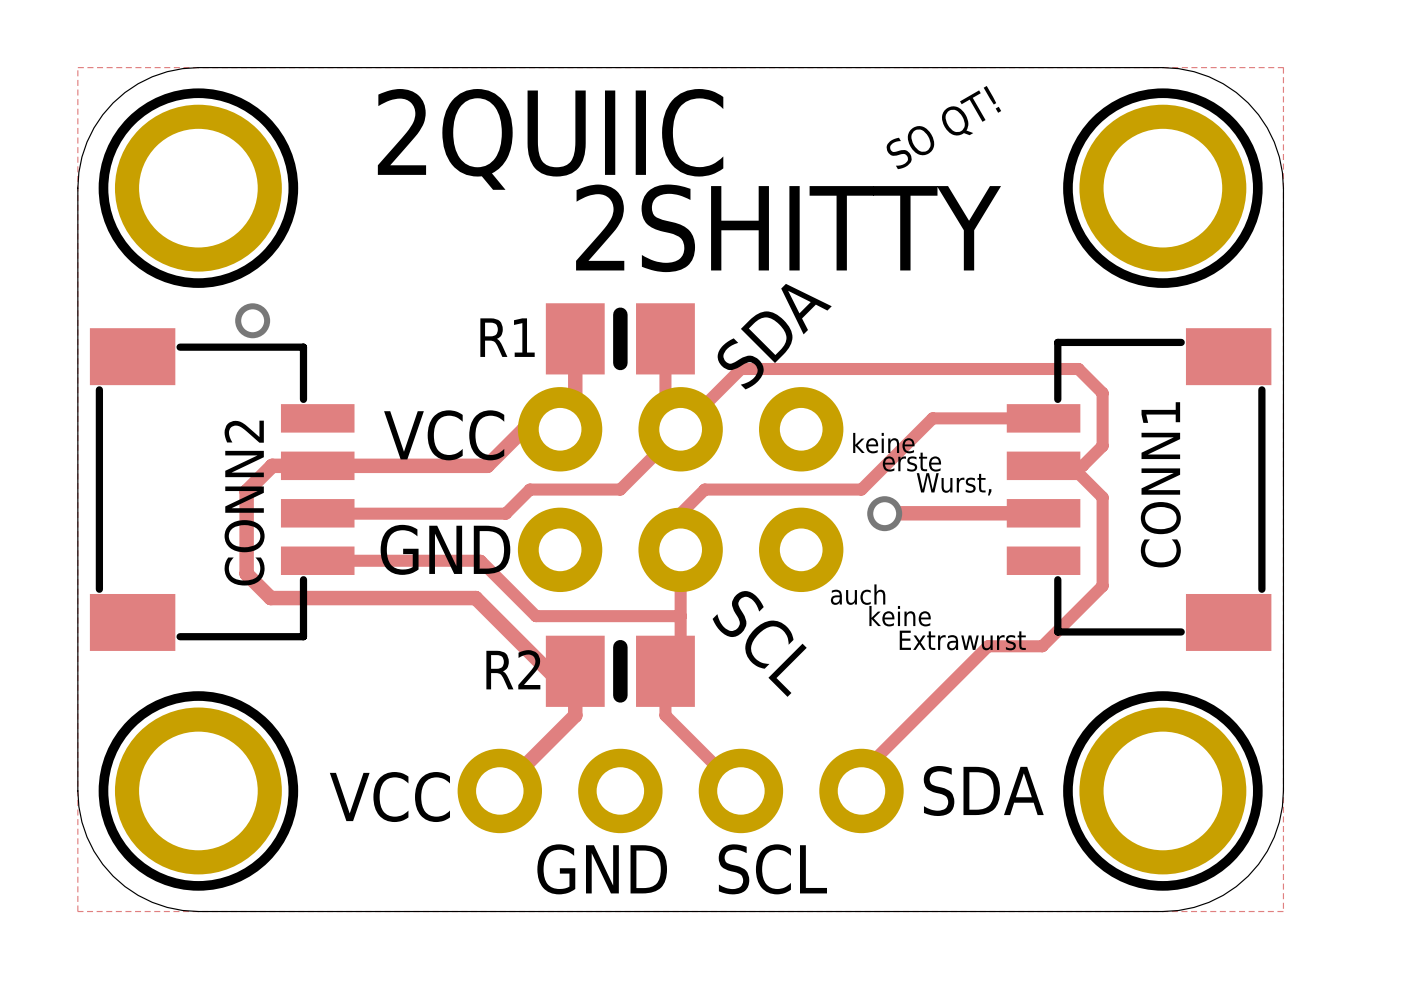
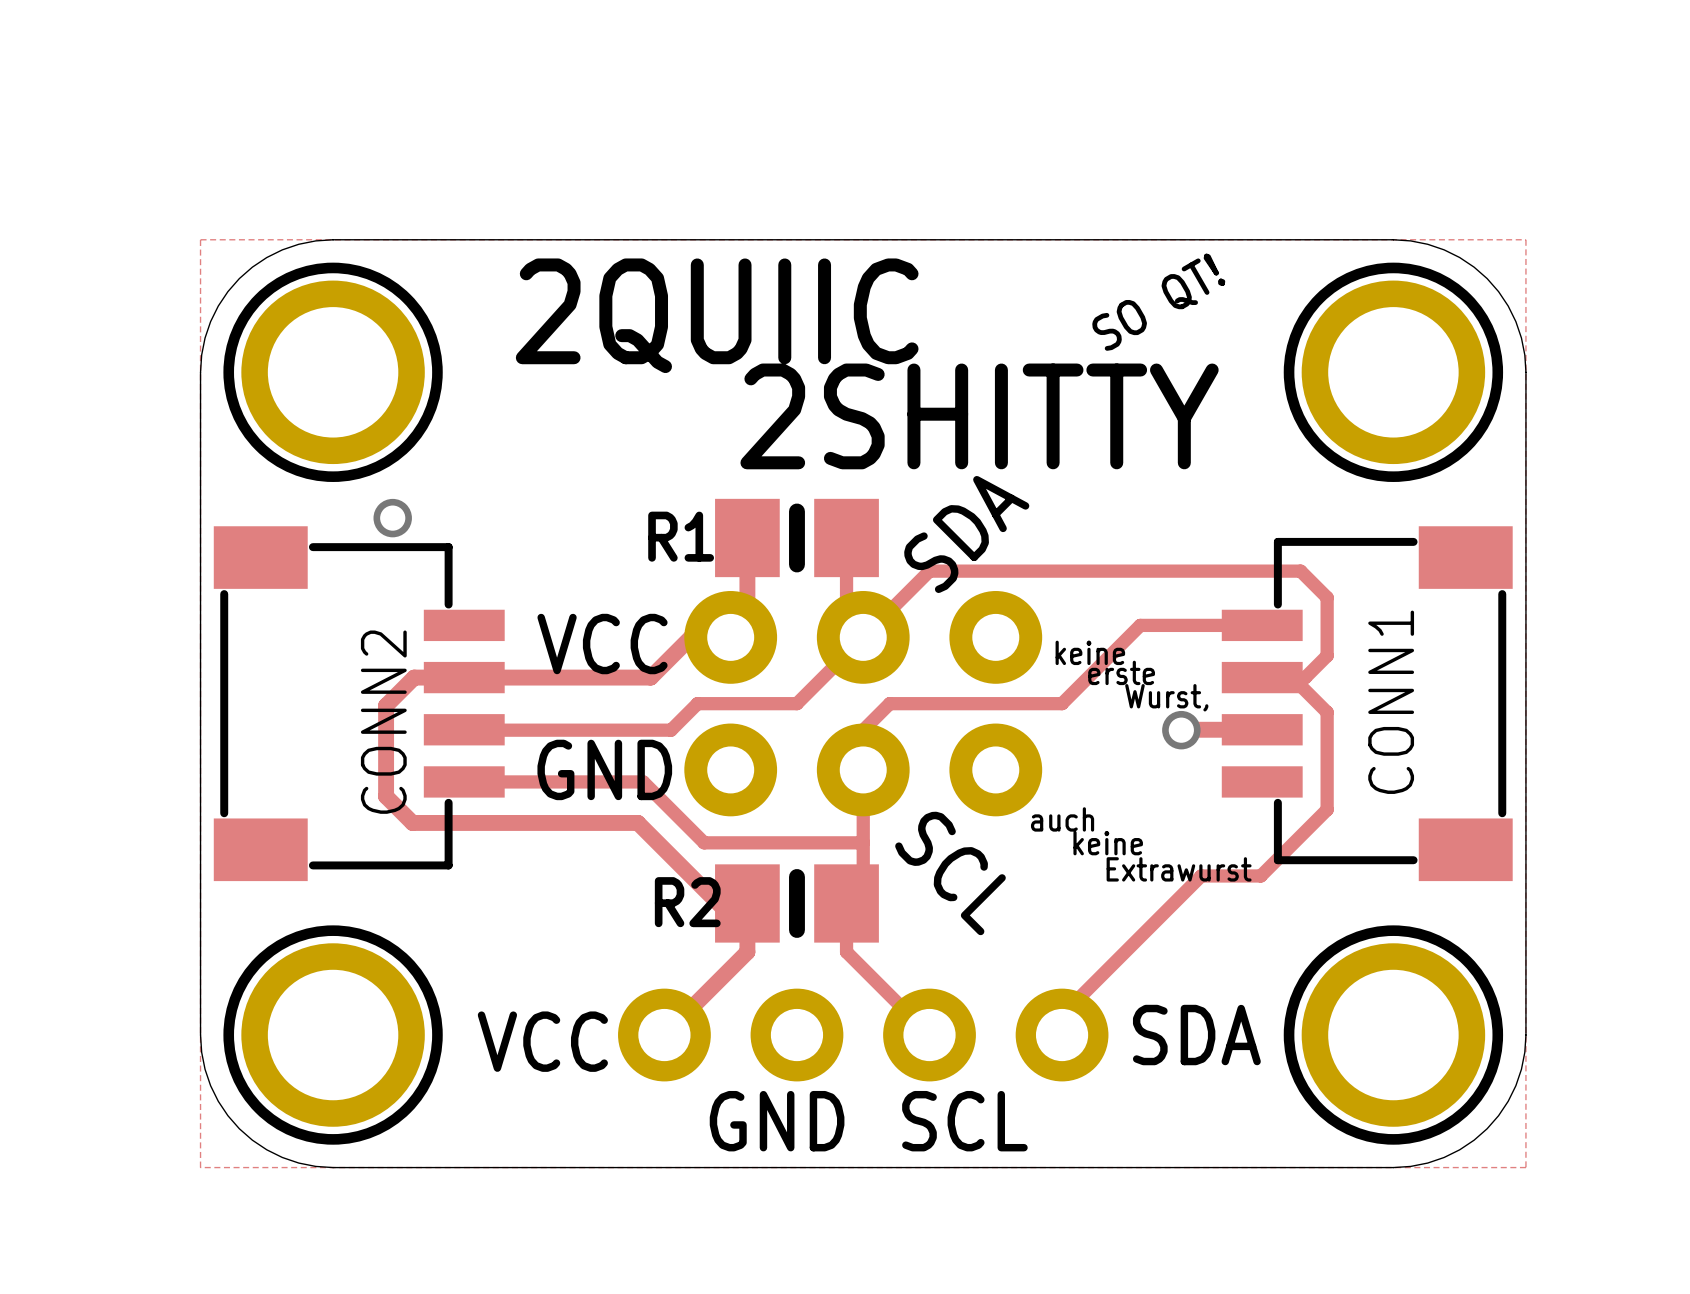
via position: (884, 513) -> (1181, 730)
track: (885, 513) (970, 513) -> none

